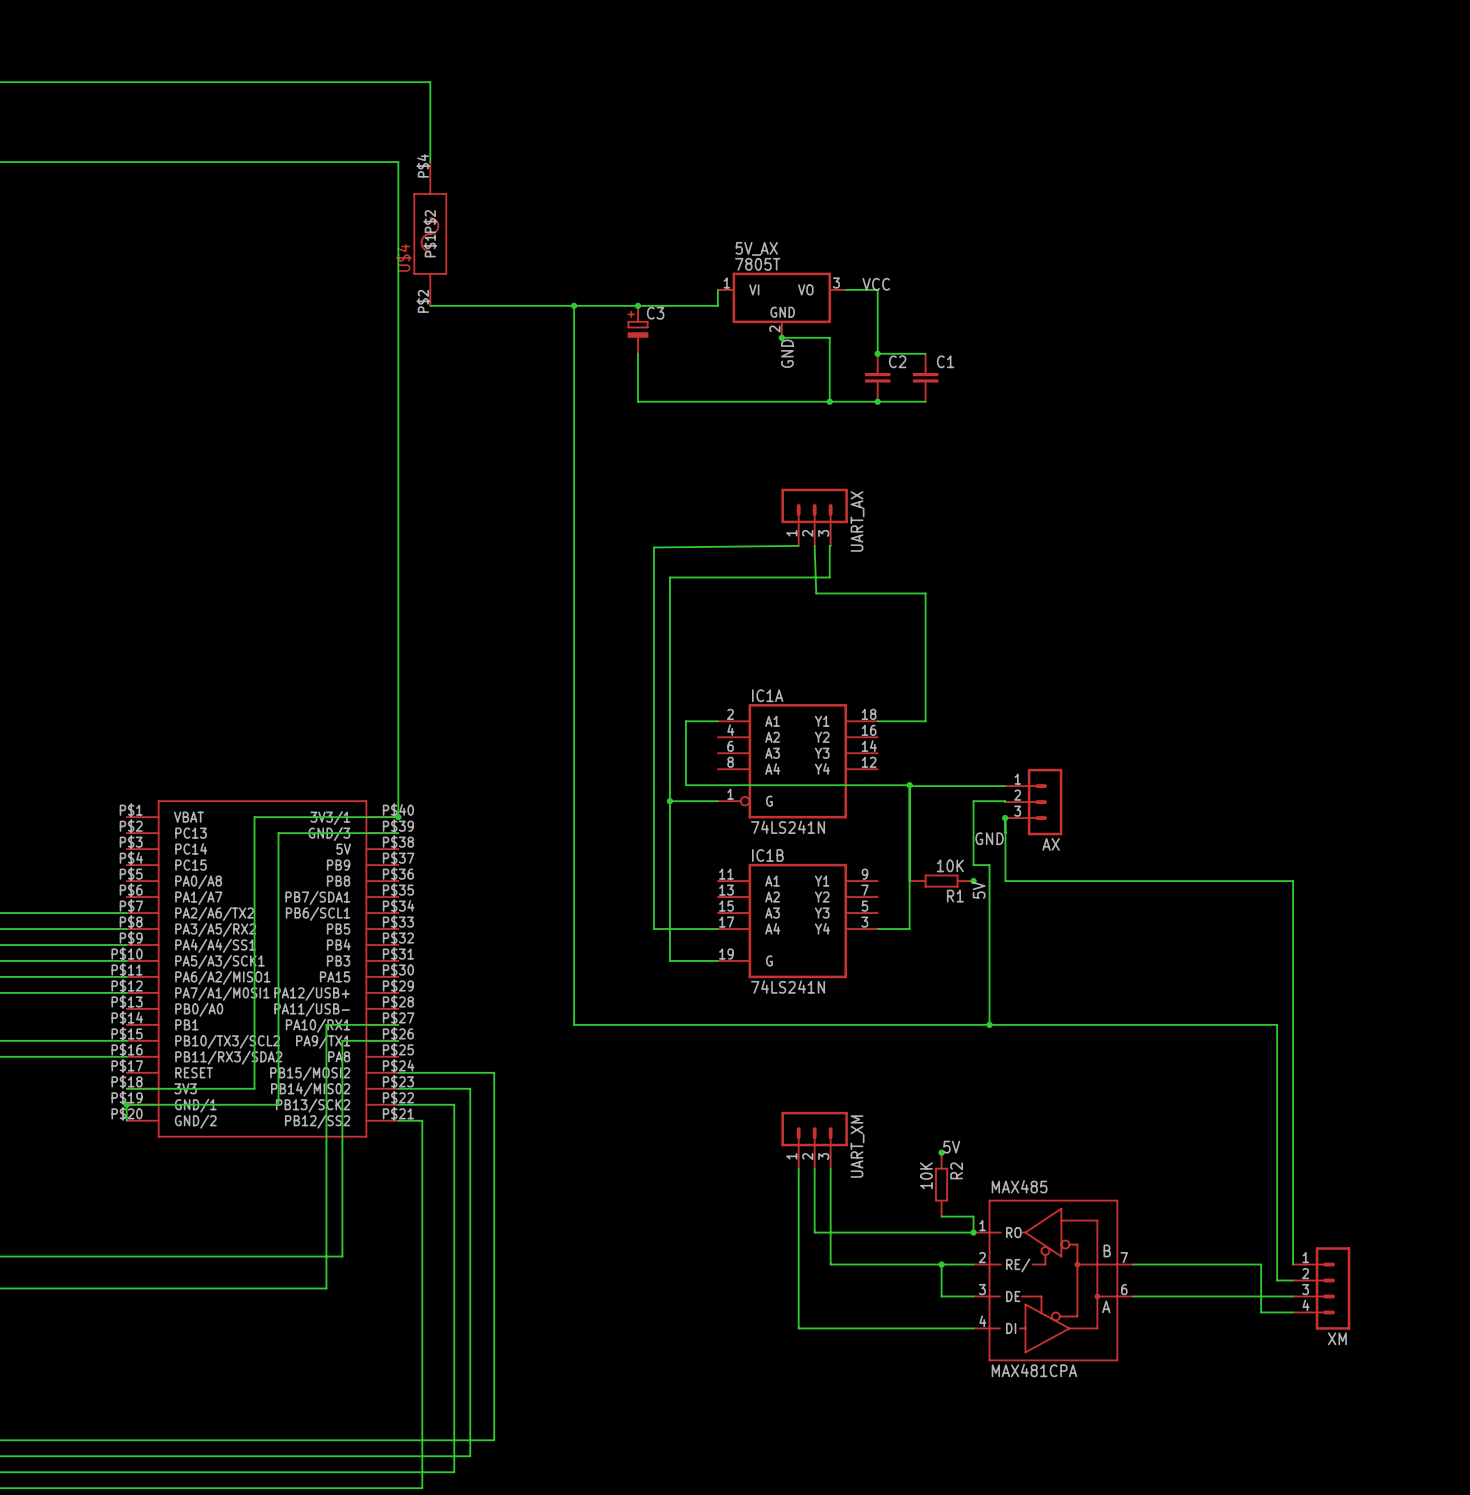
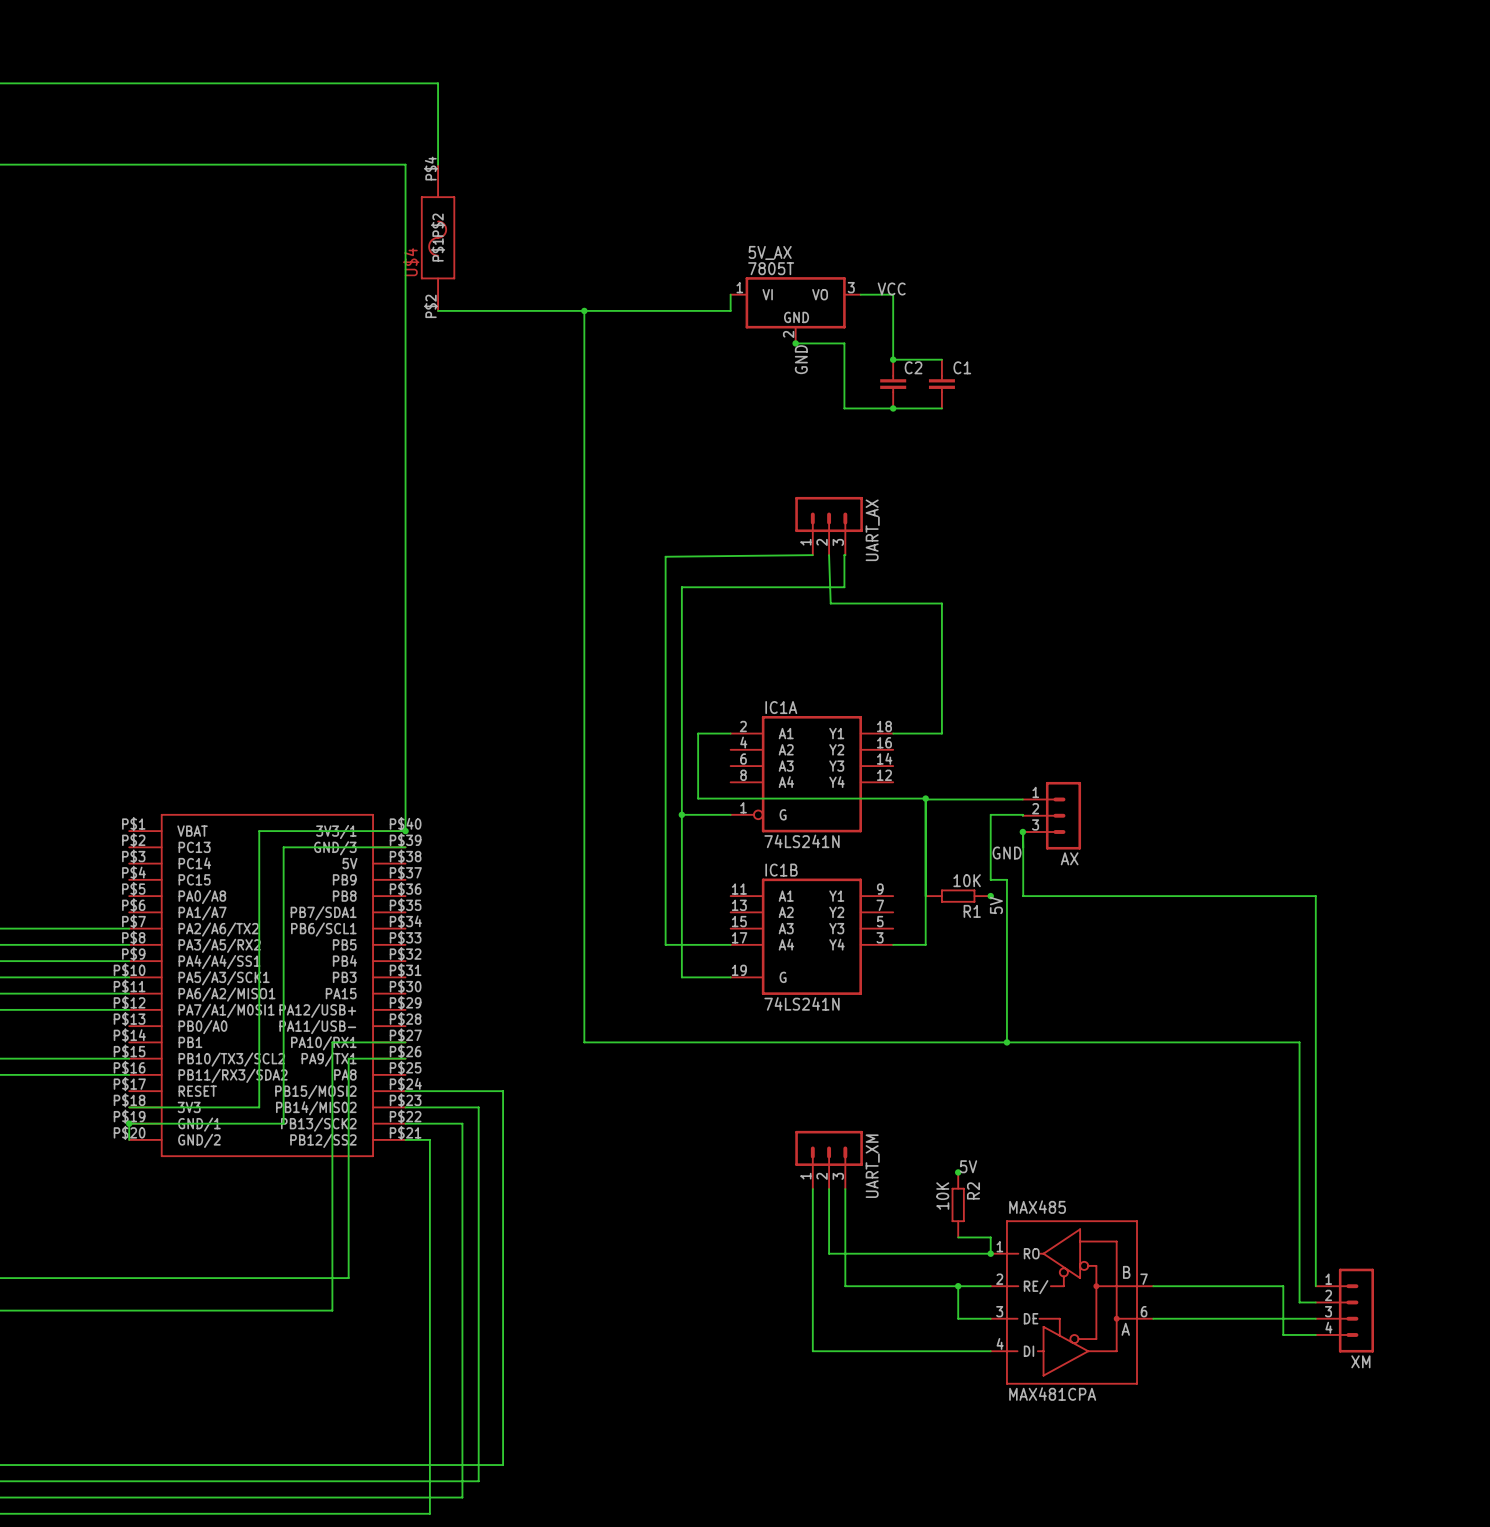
junction: (638, 305) -> none
C3: (638, 329) -> none
wire: (638, 353) (638, 401) (829, 401) -> none
junction: (829, 401) -> none

